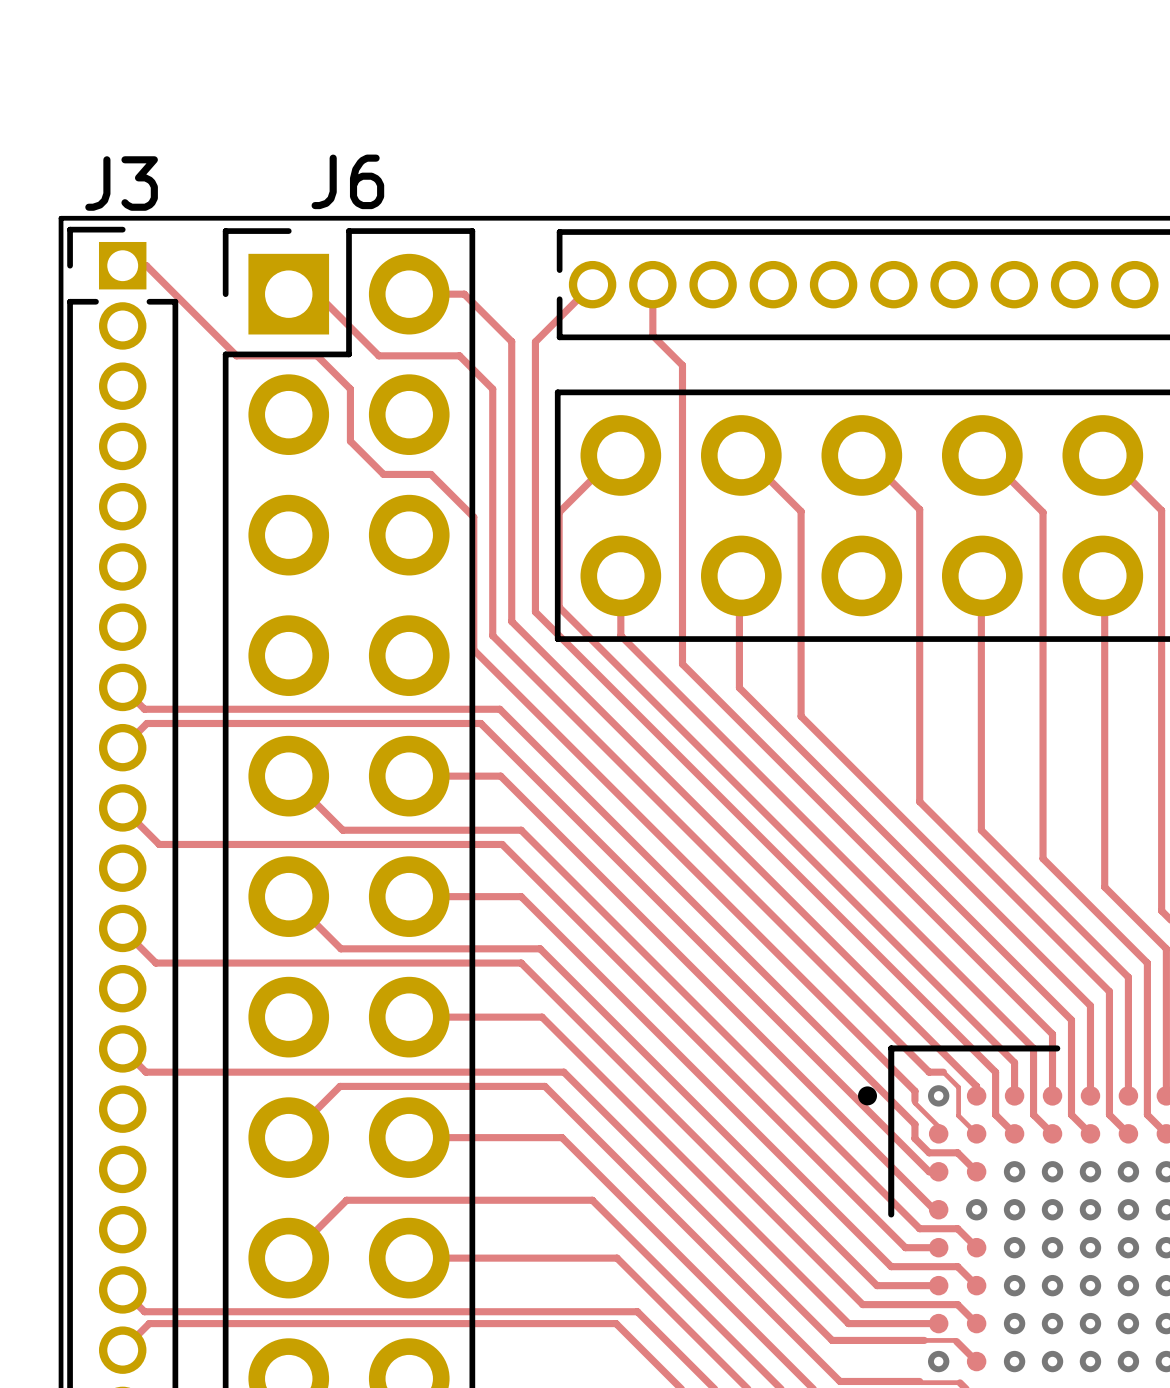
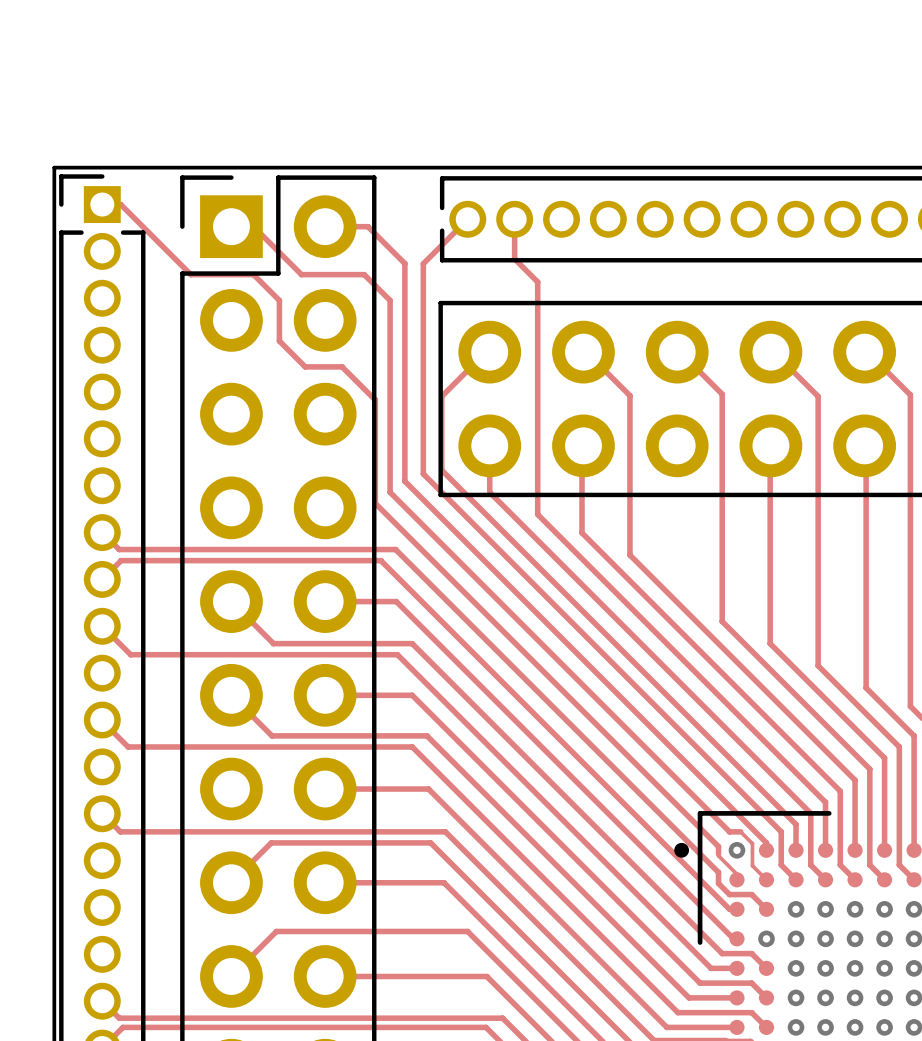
J6 name: J6 (347, 181) -> none
J3 name: J3 (121, 183) -> none

